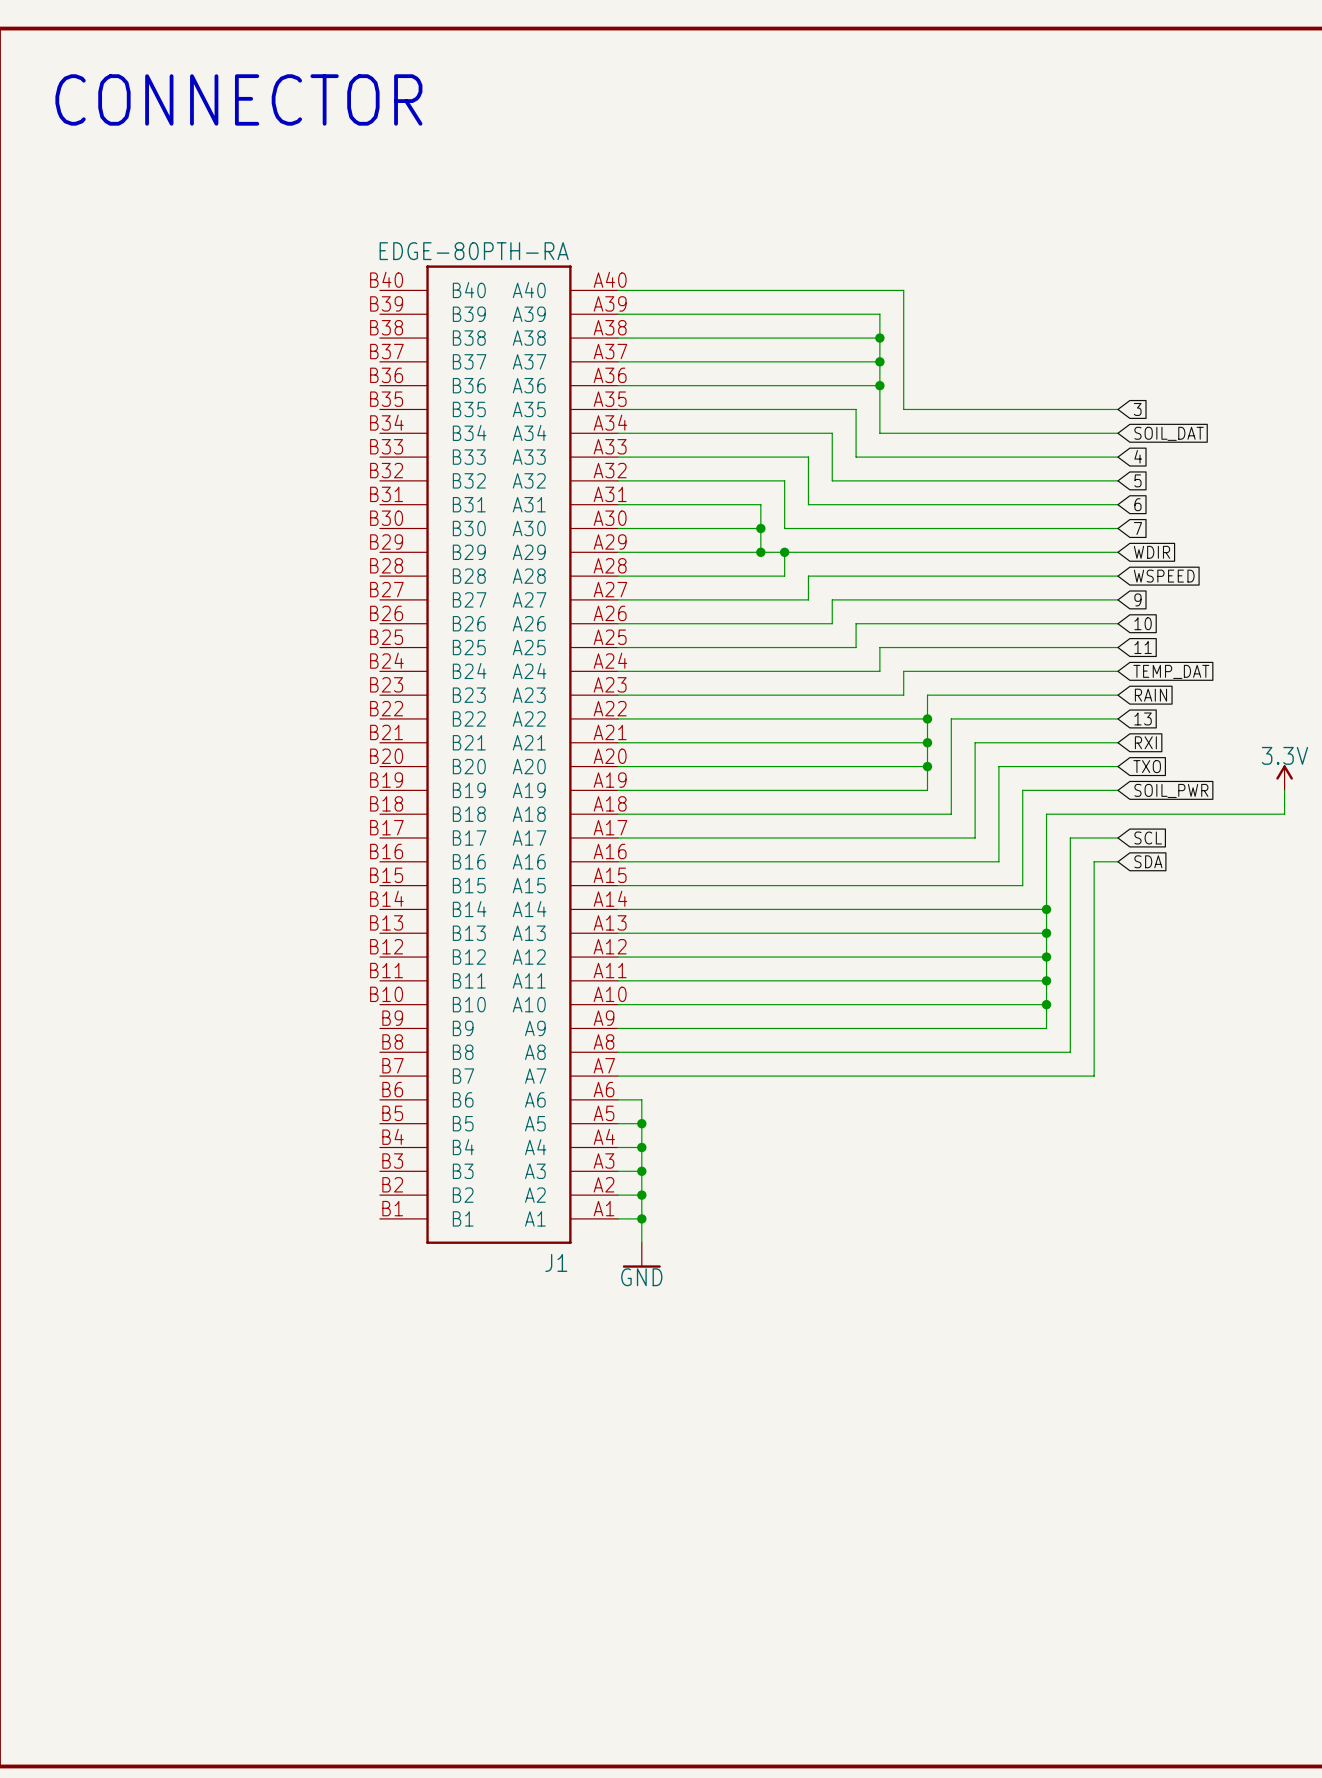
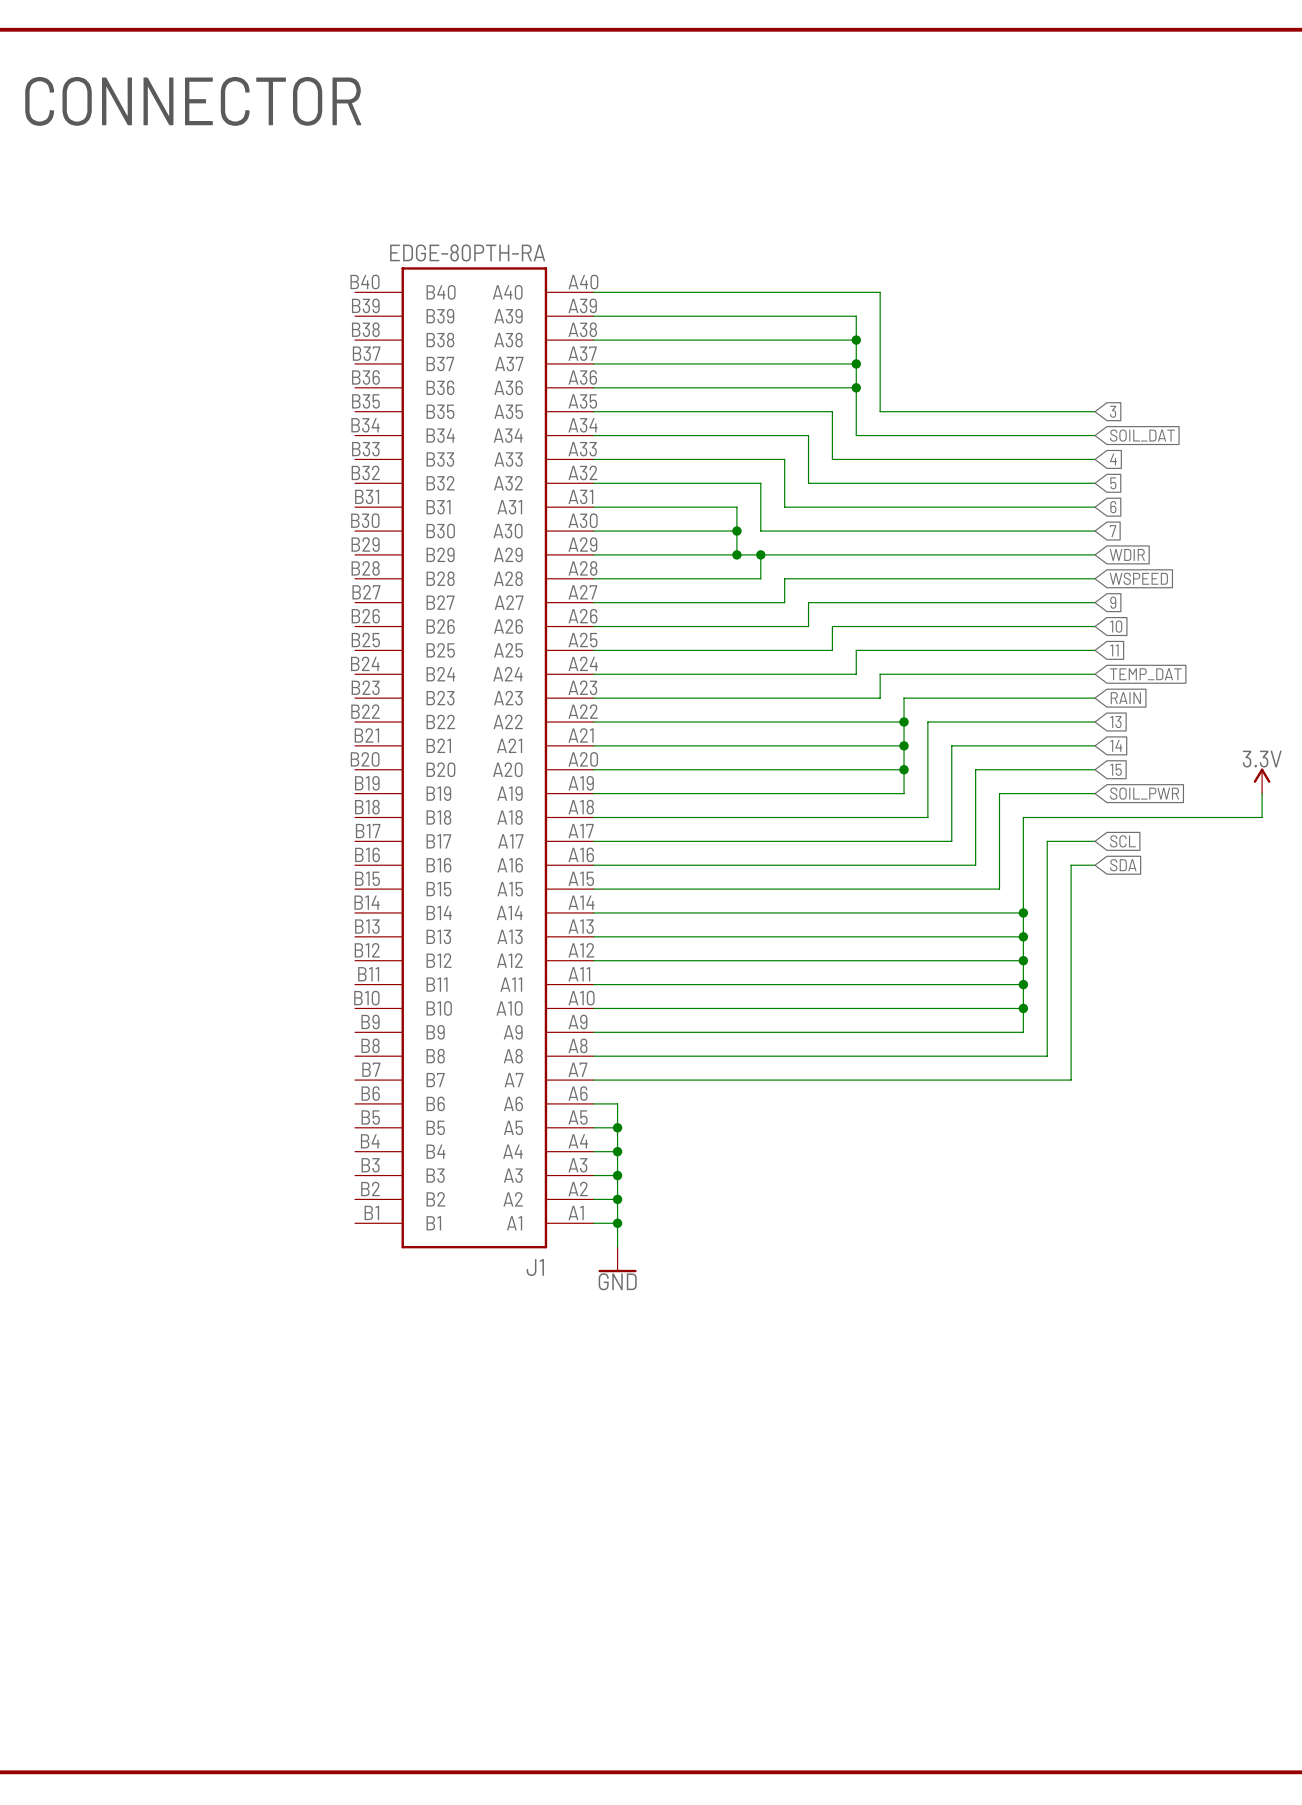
global label: RXI (1145, 742) -> 14 (1116, 745)
global label: TXO (1147, 766) -> 15 (1115, 769)

